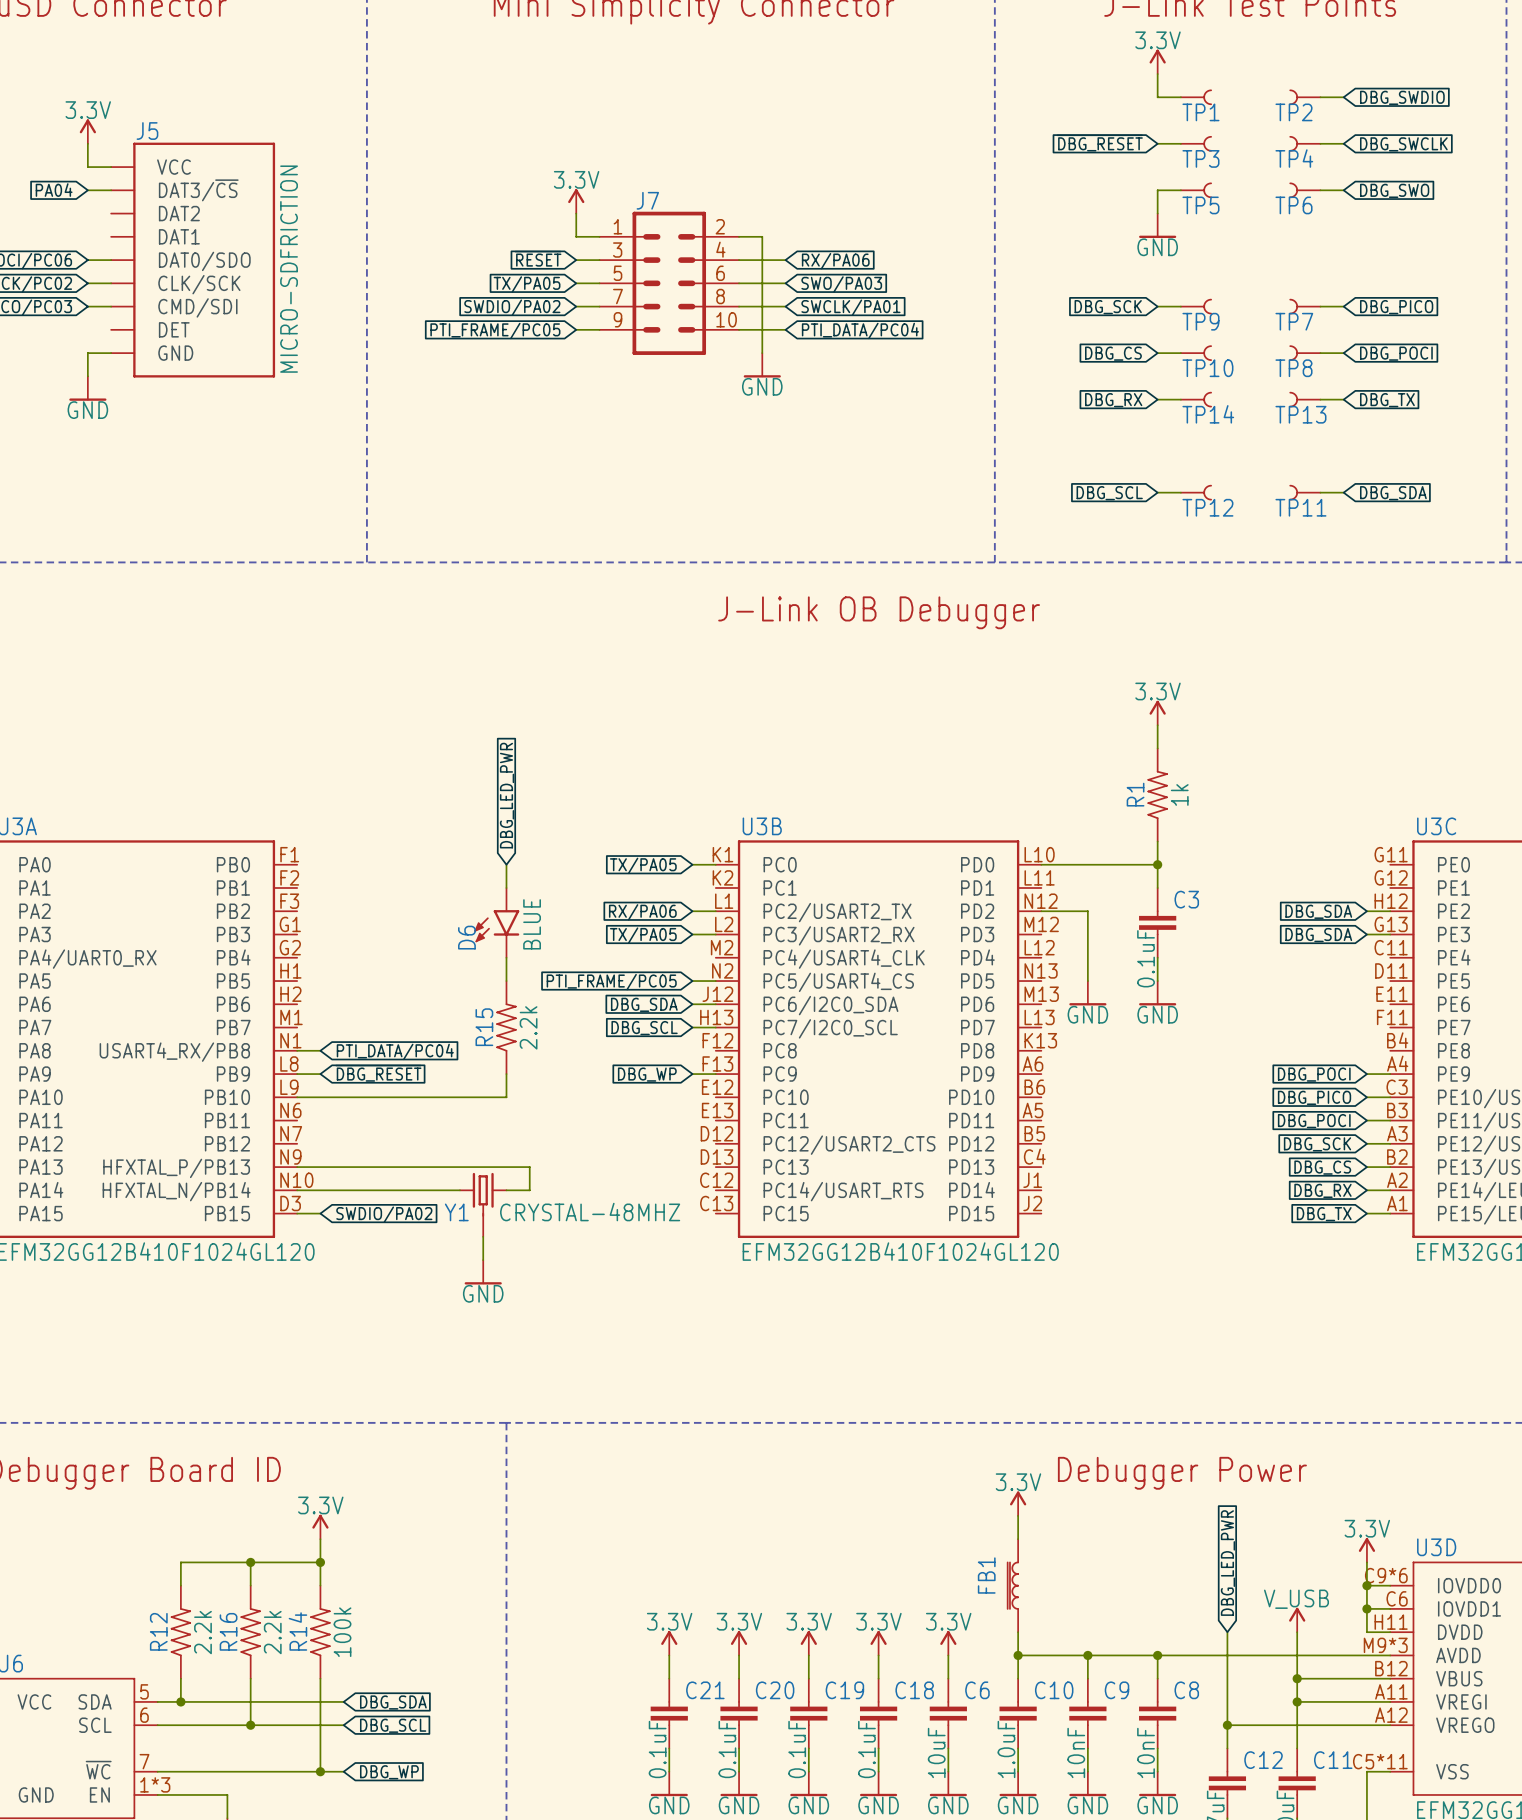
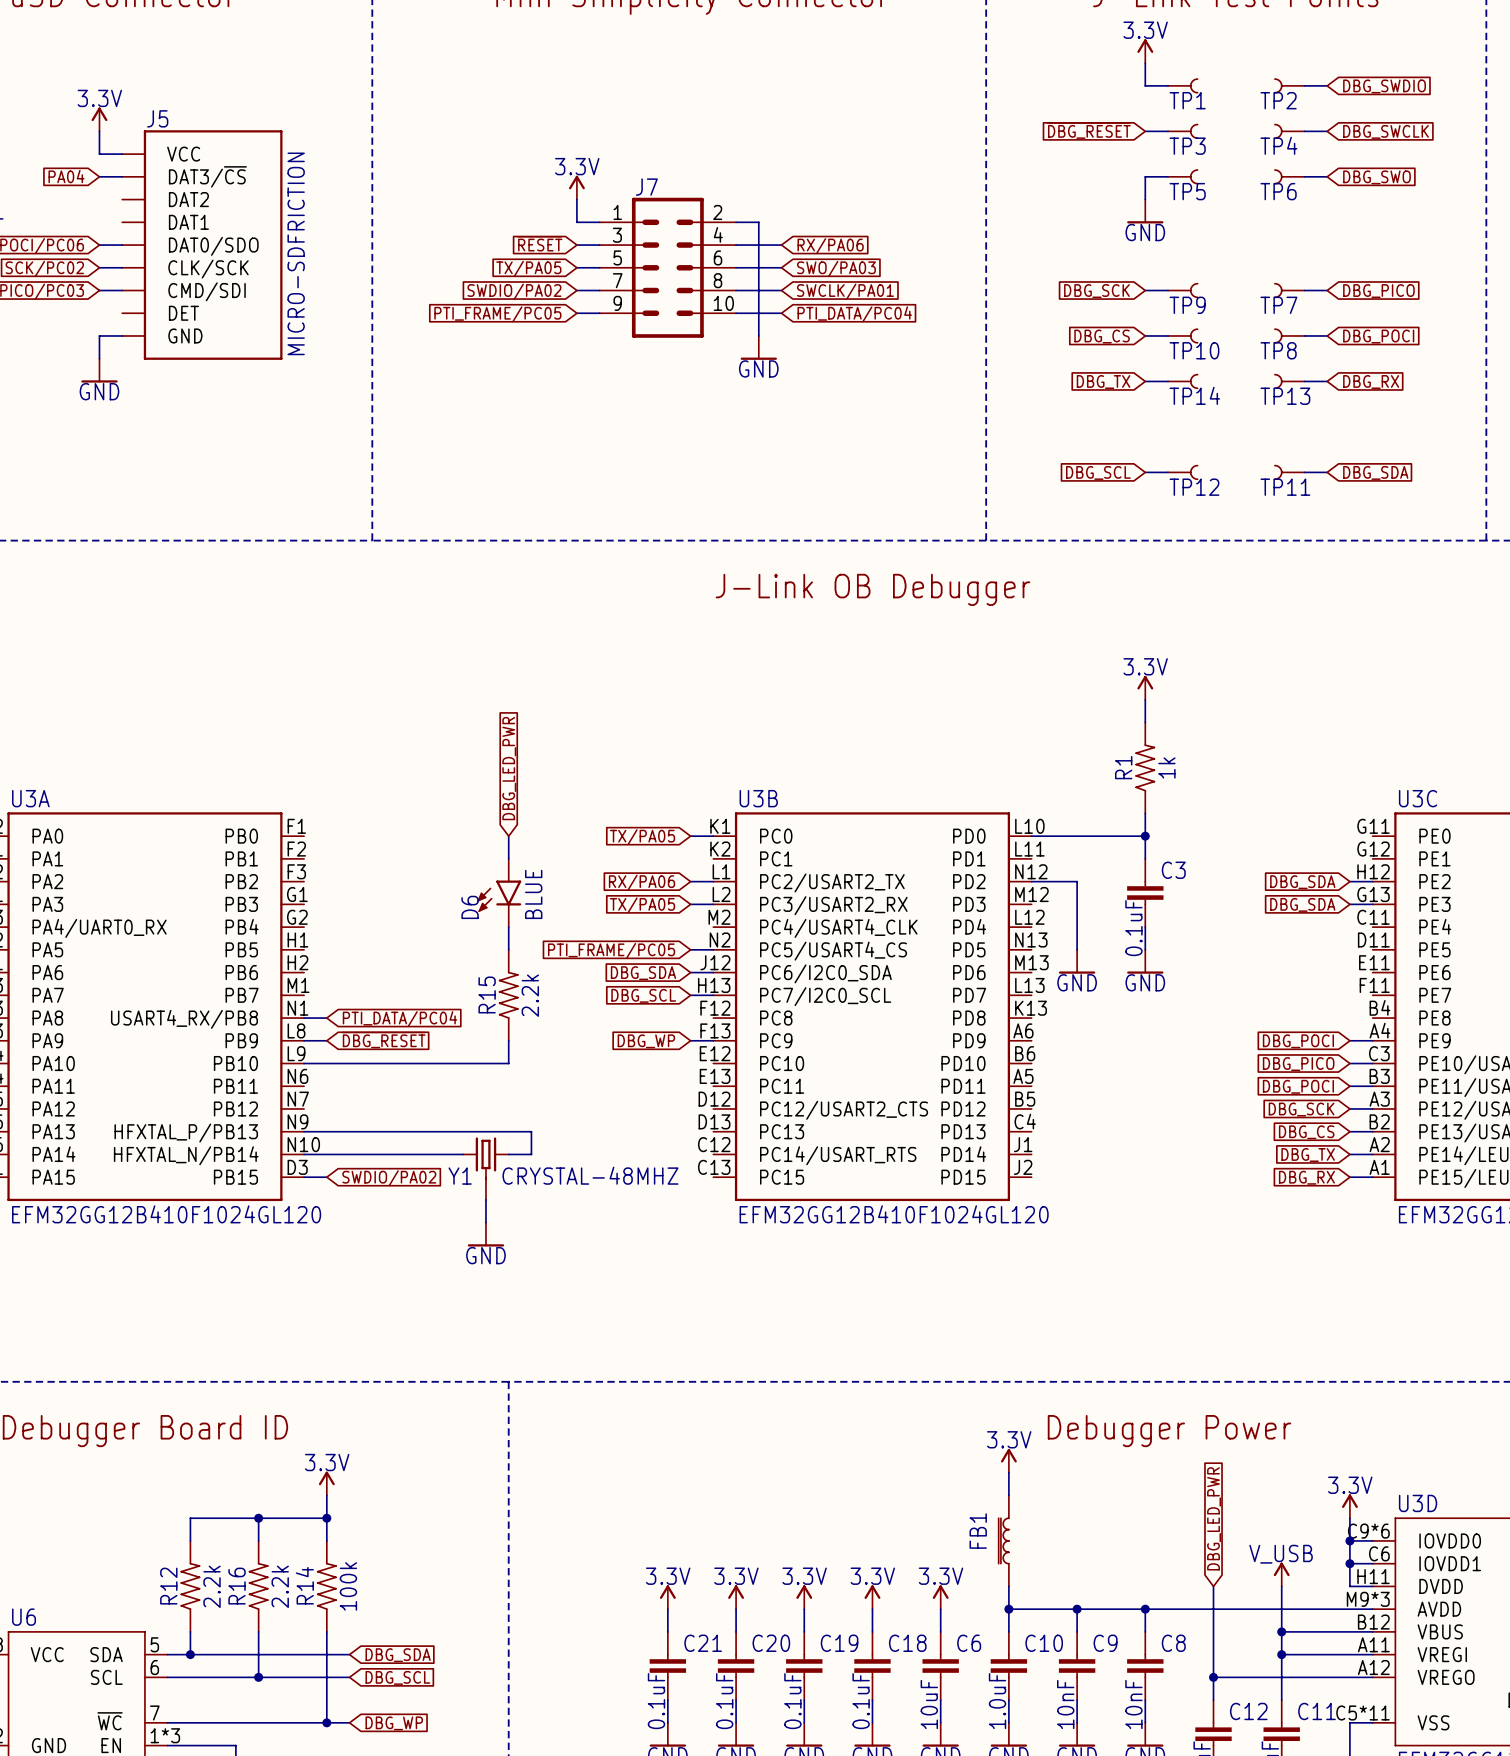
global label: DBG_RX (1113, 400) -> DBG_TX (1103, 382)
global label: DBG_TX (1387, 400) -> DBG_RX (1371, 382)
global label: DBG_RX (1322, 1190) -> DBG_TX (1308, 1155)
global label: DBG_TX (1324, 1214) -> DBG_RX (1306, 1177)

